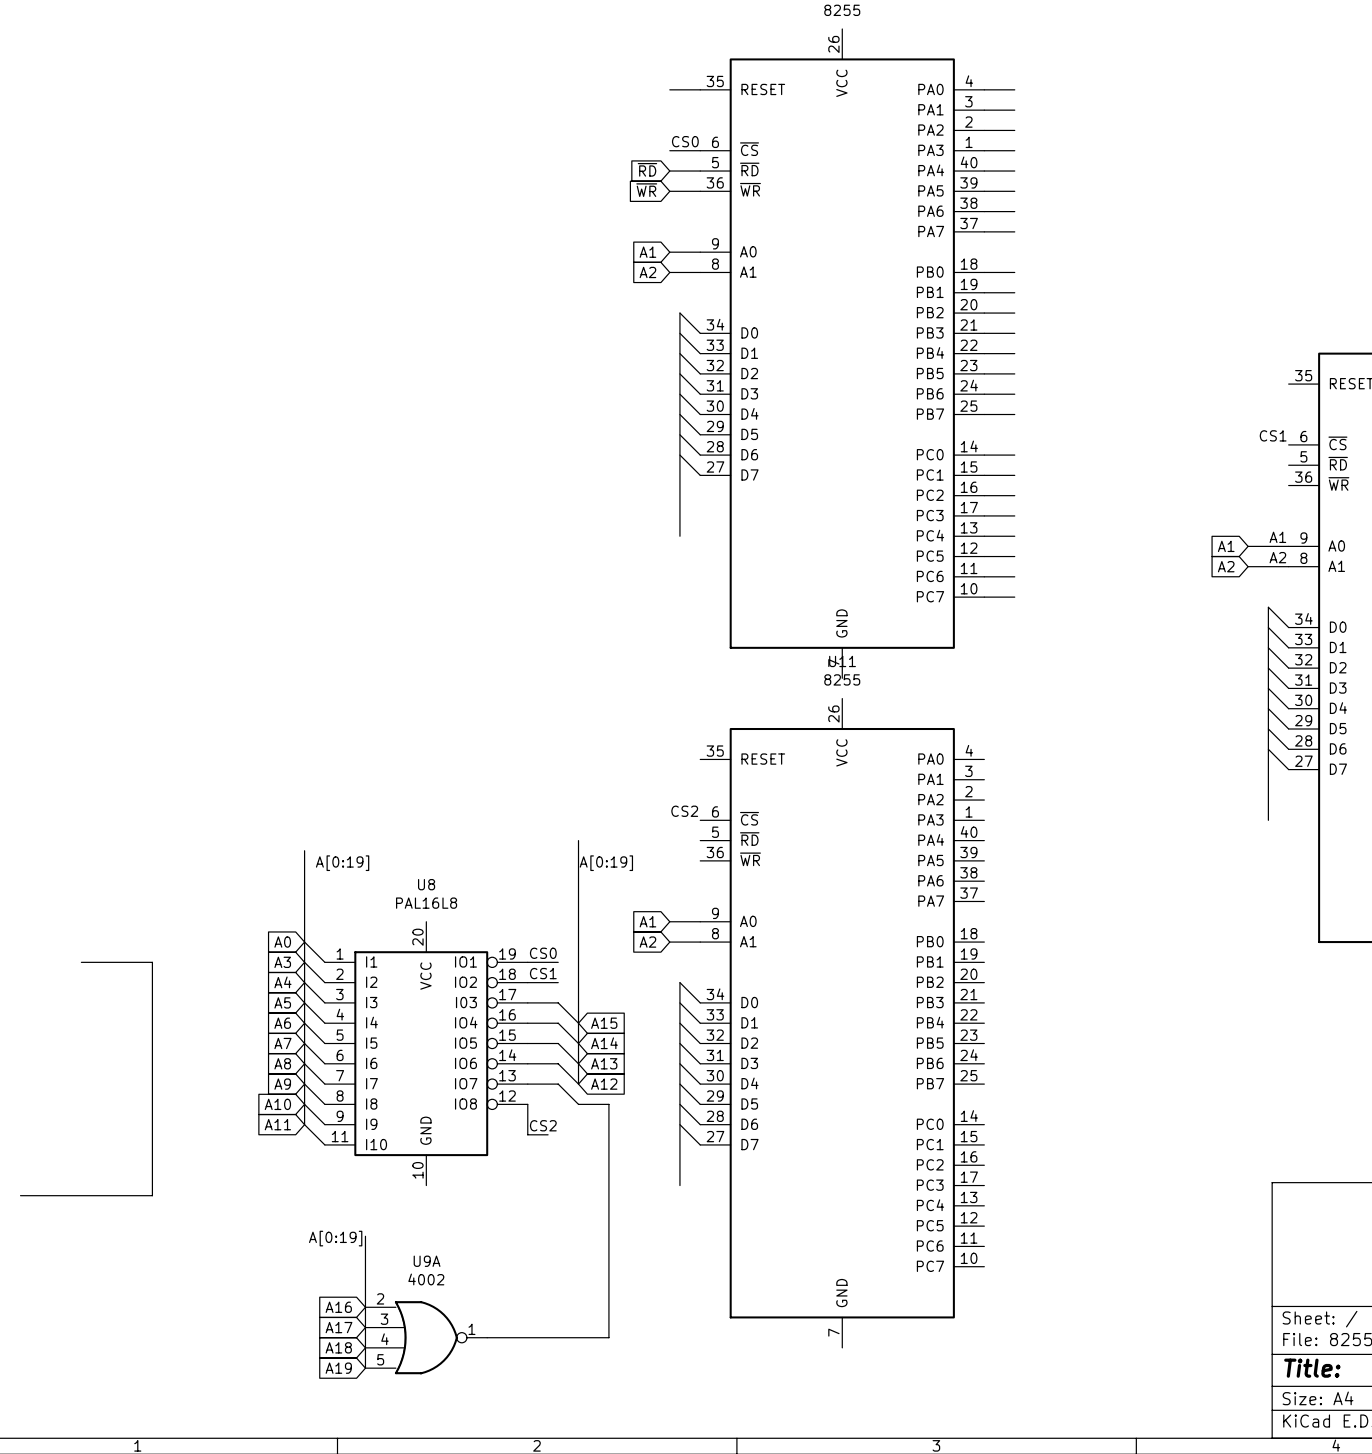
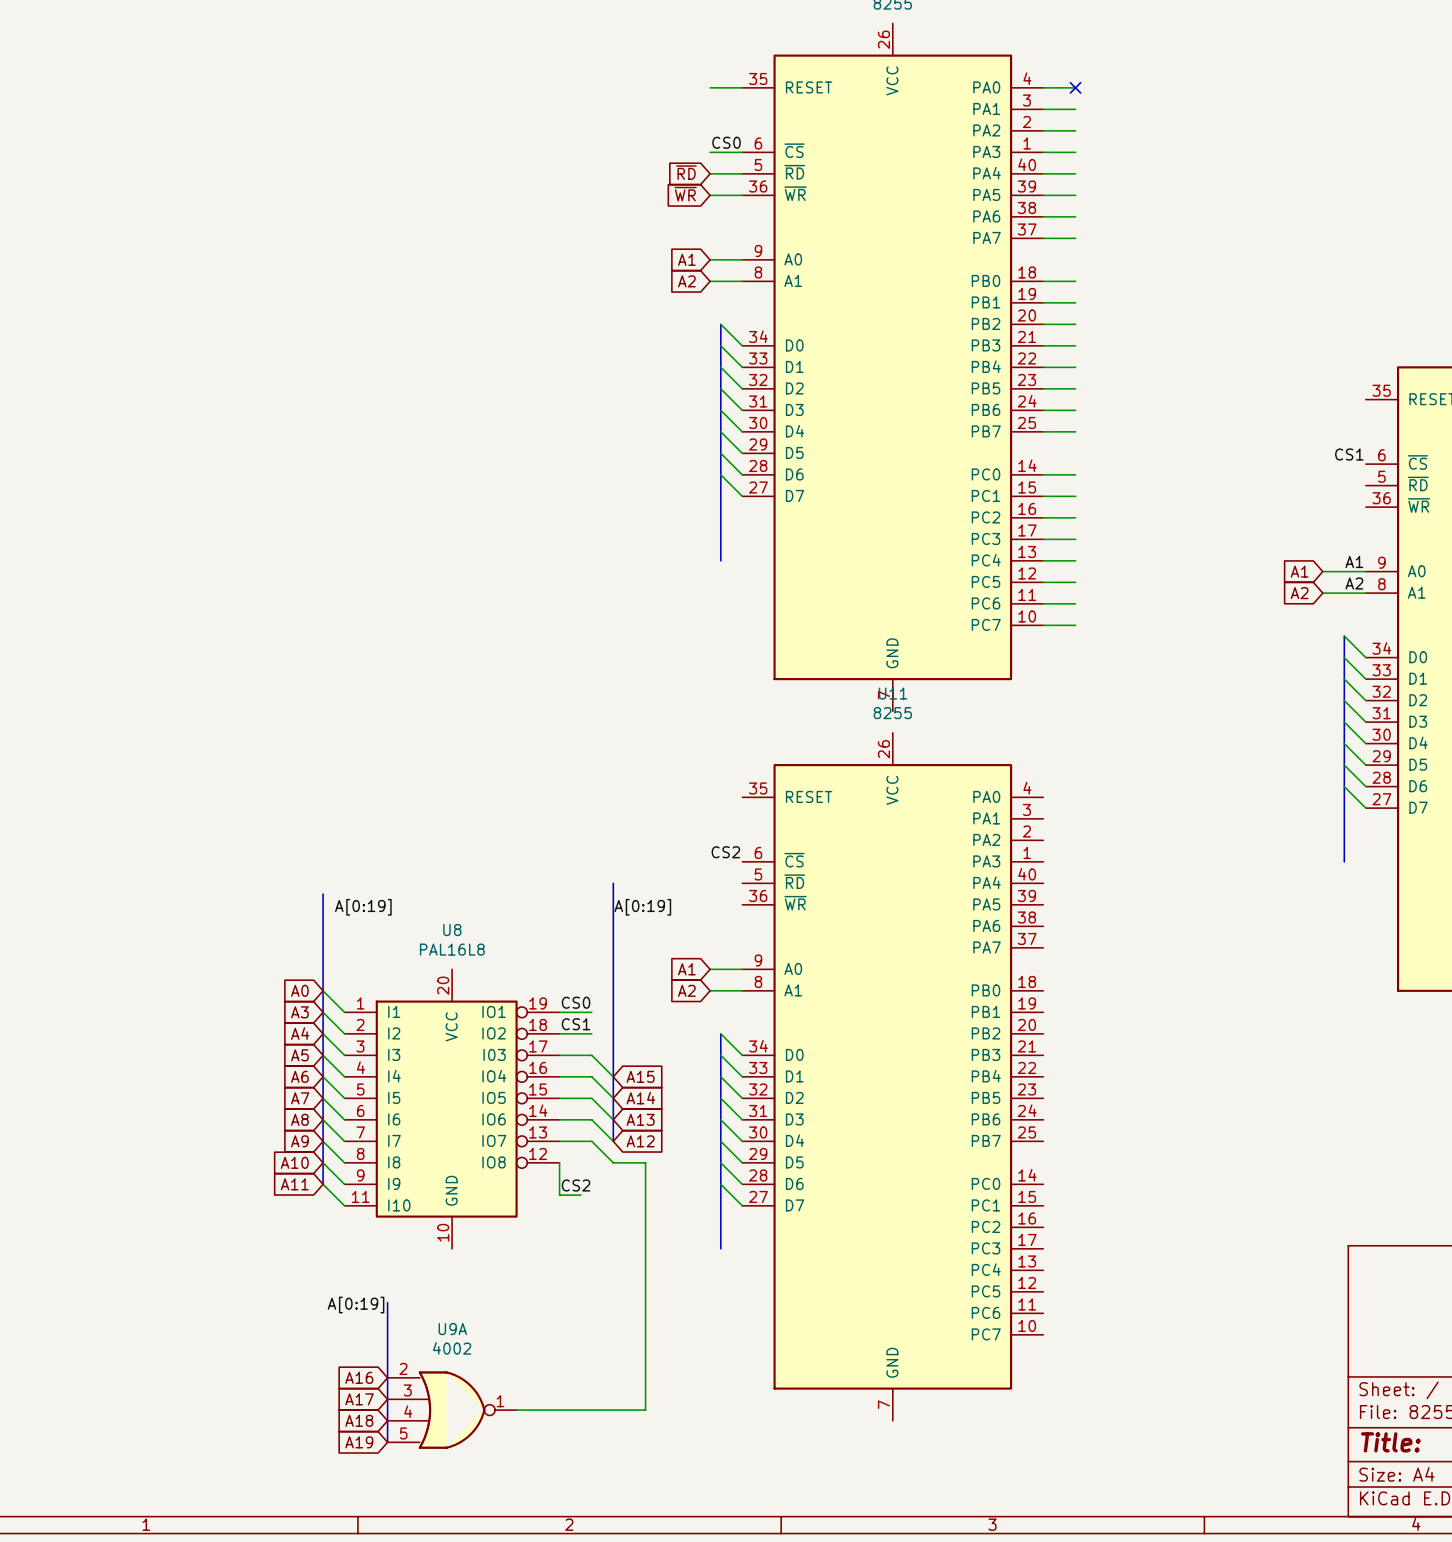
no-connect mark: none -> (1075, 87)
wire: (81, 962) (152, 962) (152, 1195) (20, 1195) -> none

